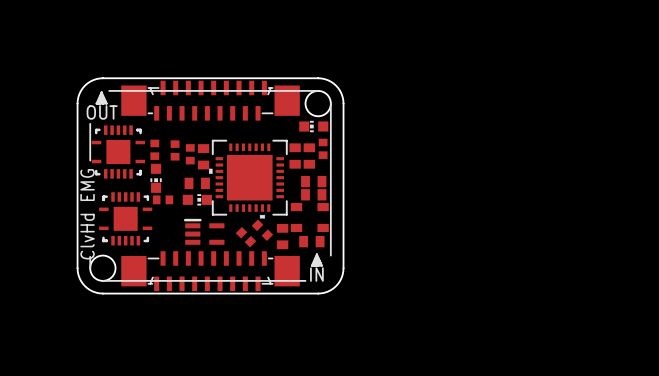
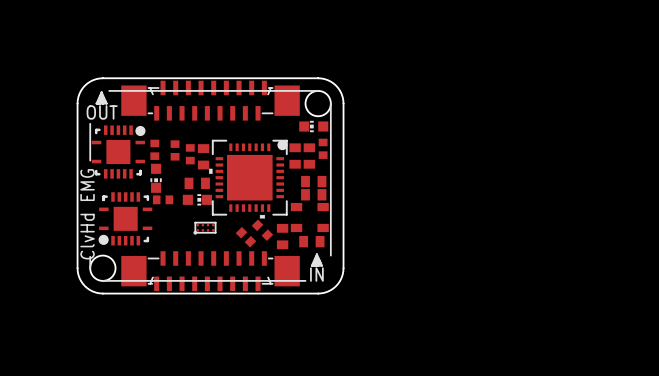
part footprint: [91, 125, 145, 179] -> [91, 125, 146, 179]
drawing: none -> [277, 140, 288, 151]
part footprint: [99, 192, 153, 246] -> [98, 192, 153, 246]
part footprint: [183, 218, 225, 245] -> [193, 222, 217, 235]

